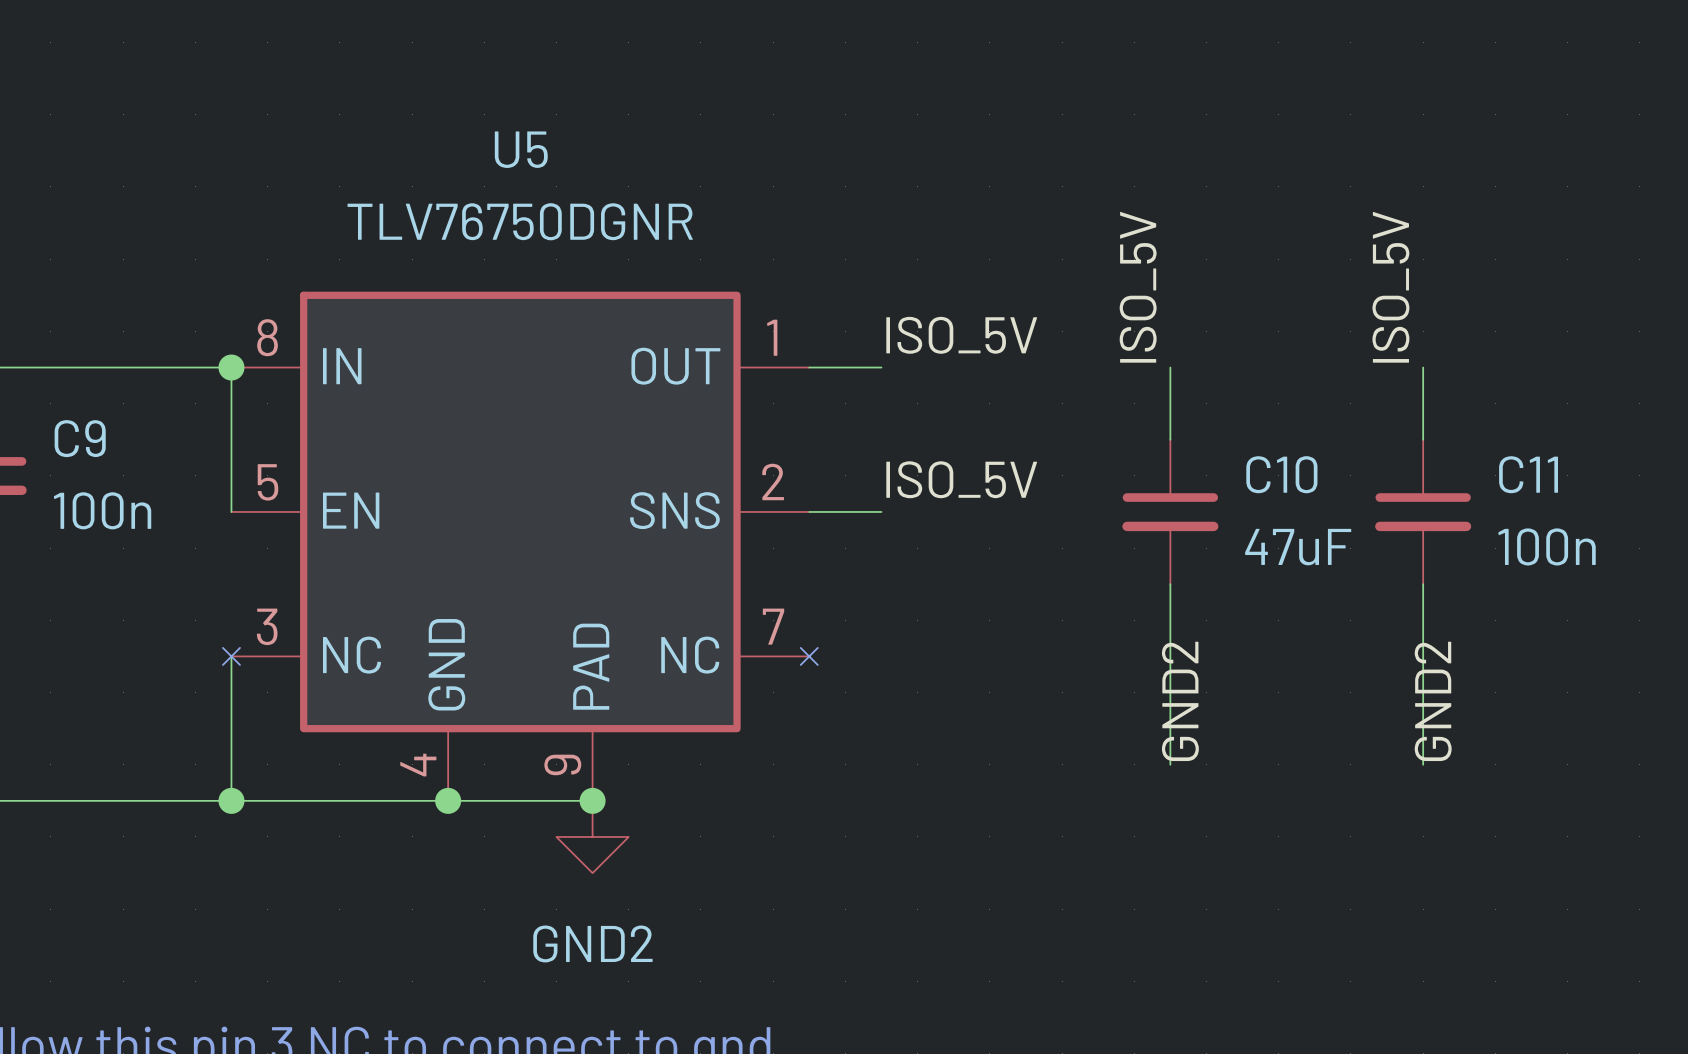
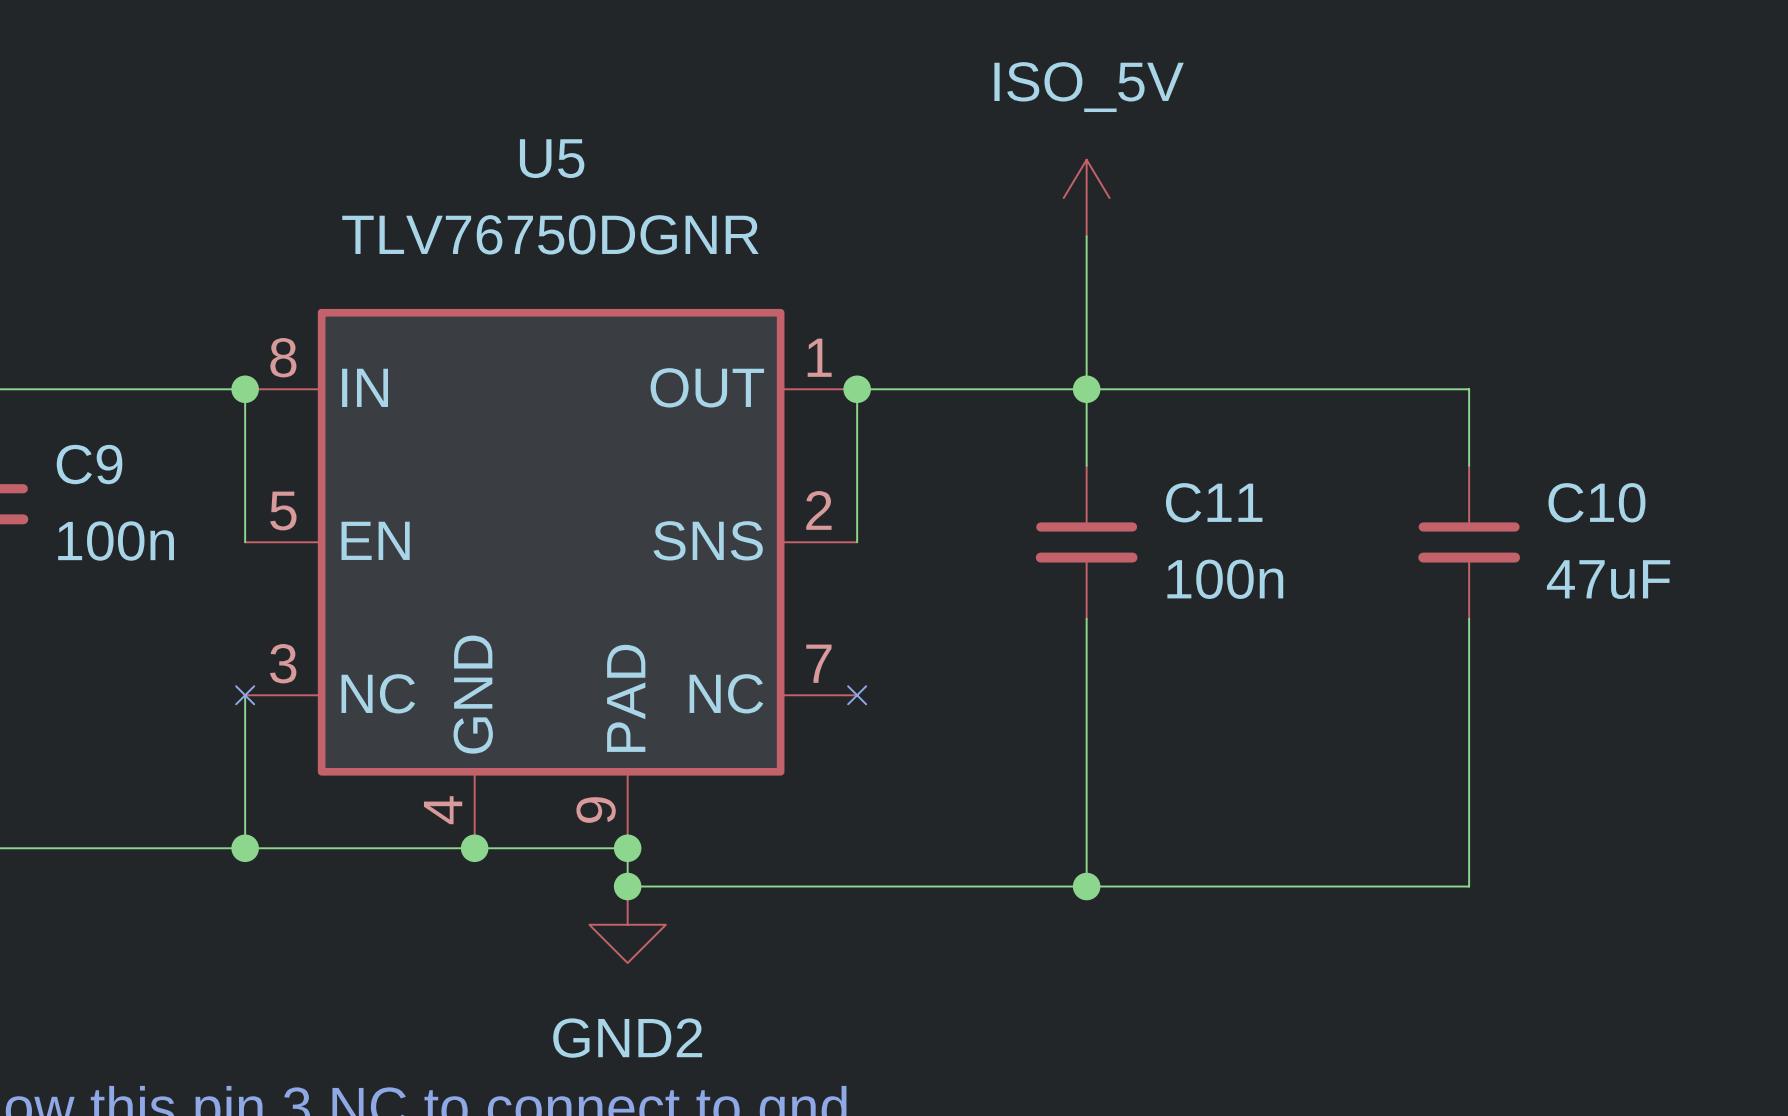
power symbol: none -> ISO_5V (1086, 198)
wire: none -> (1086, 236) (1086, 465)
label: ISO_5V (1138, 287) -> none
label: ISO_5V (1390, 287) -> none
label: ISO_5V (961, 335) -> none
junction: none -> (857, 389)
wire: none -> (933, 389) (1469, 389) (1469, 465)
junction: none -> (1086, 389)
wire: (1170, 367) (1170, 439) -> none
wire: (1423, 367) (1423, 439) -> none
label: ISO_5V (961, 479) -> none
wire: (809, 511) (881, 511) -> (857, 542) (857, 389)
C10 position: (1170, 511) -> (1469, 542)
C11 position: (1423, 511) -> (1086, 542)
wire: none -> (1086, 618) (1086, 886)
wire: (1170, 584) (1170, 764) -> none
wire: none -> (1469, 618) (1469, 886) (627, 886) (627, 848)
wire: (1423, 584) (1423, 764) -> none
label: GND2 (1180, 701) -> none
label: GND2 (1433, 701) -> none
power symbol position: GND2 (592, 836) -> GND2 (627, 924)
junction: none -> (627, 886)
junction: none -> (1086, 886)

